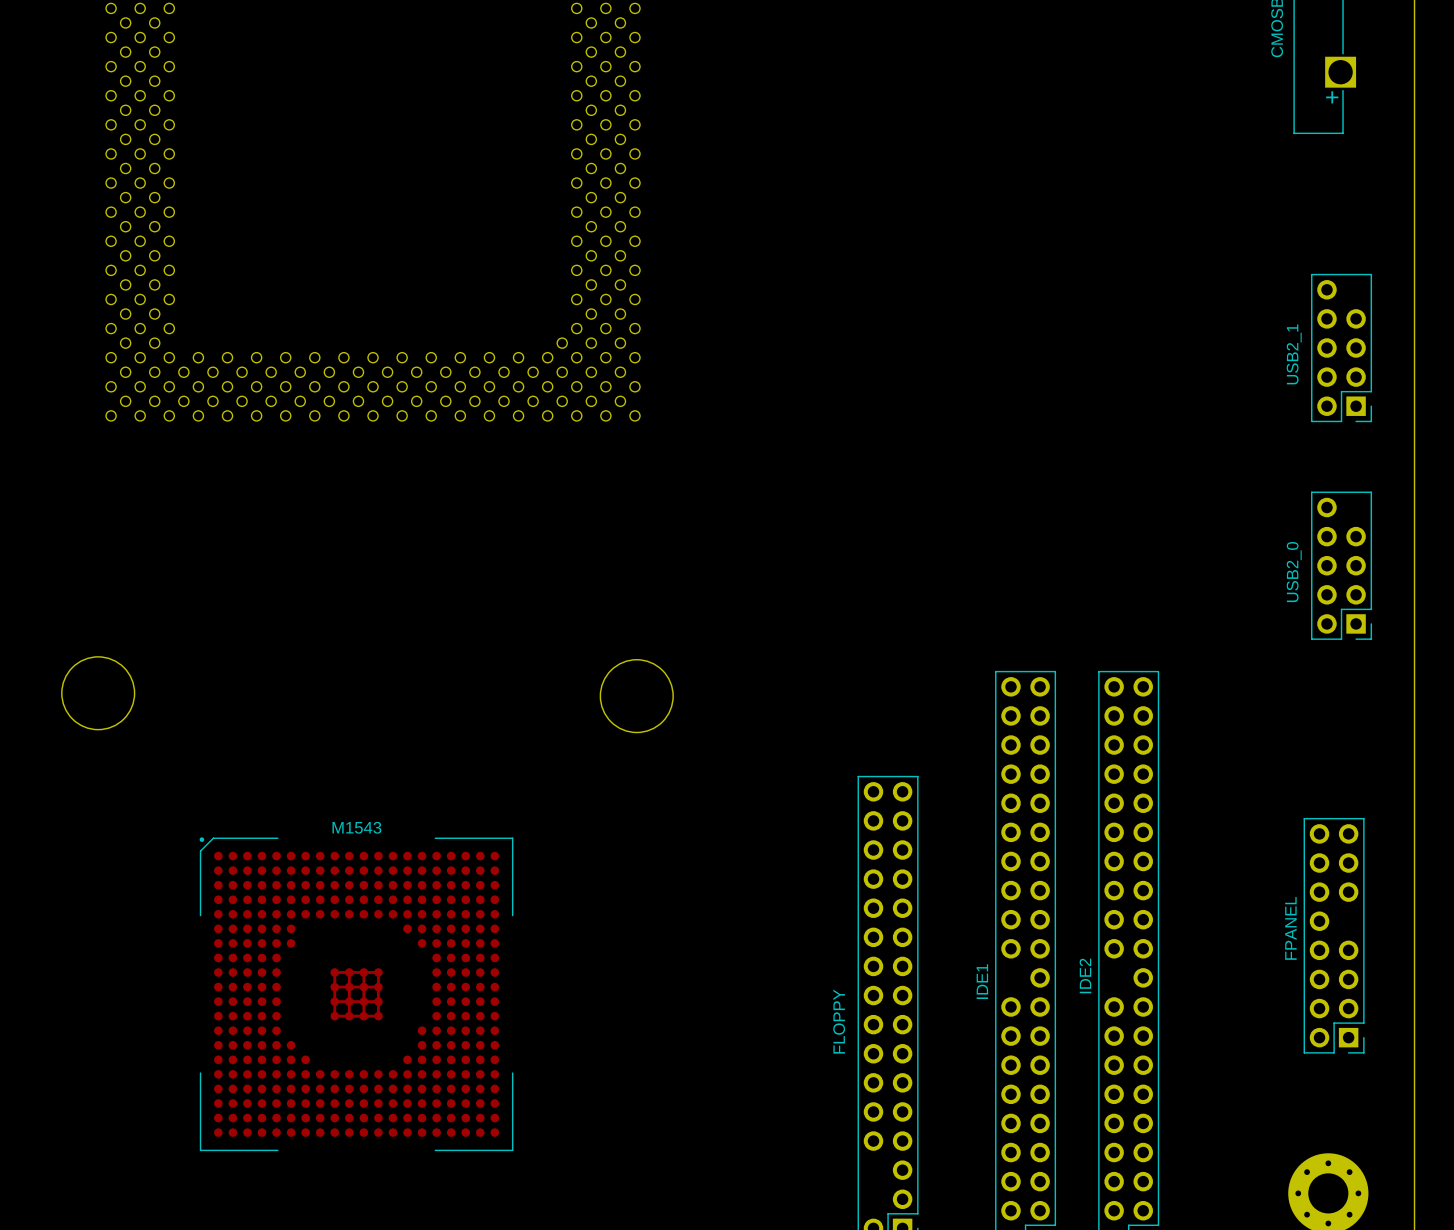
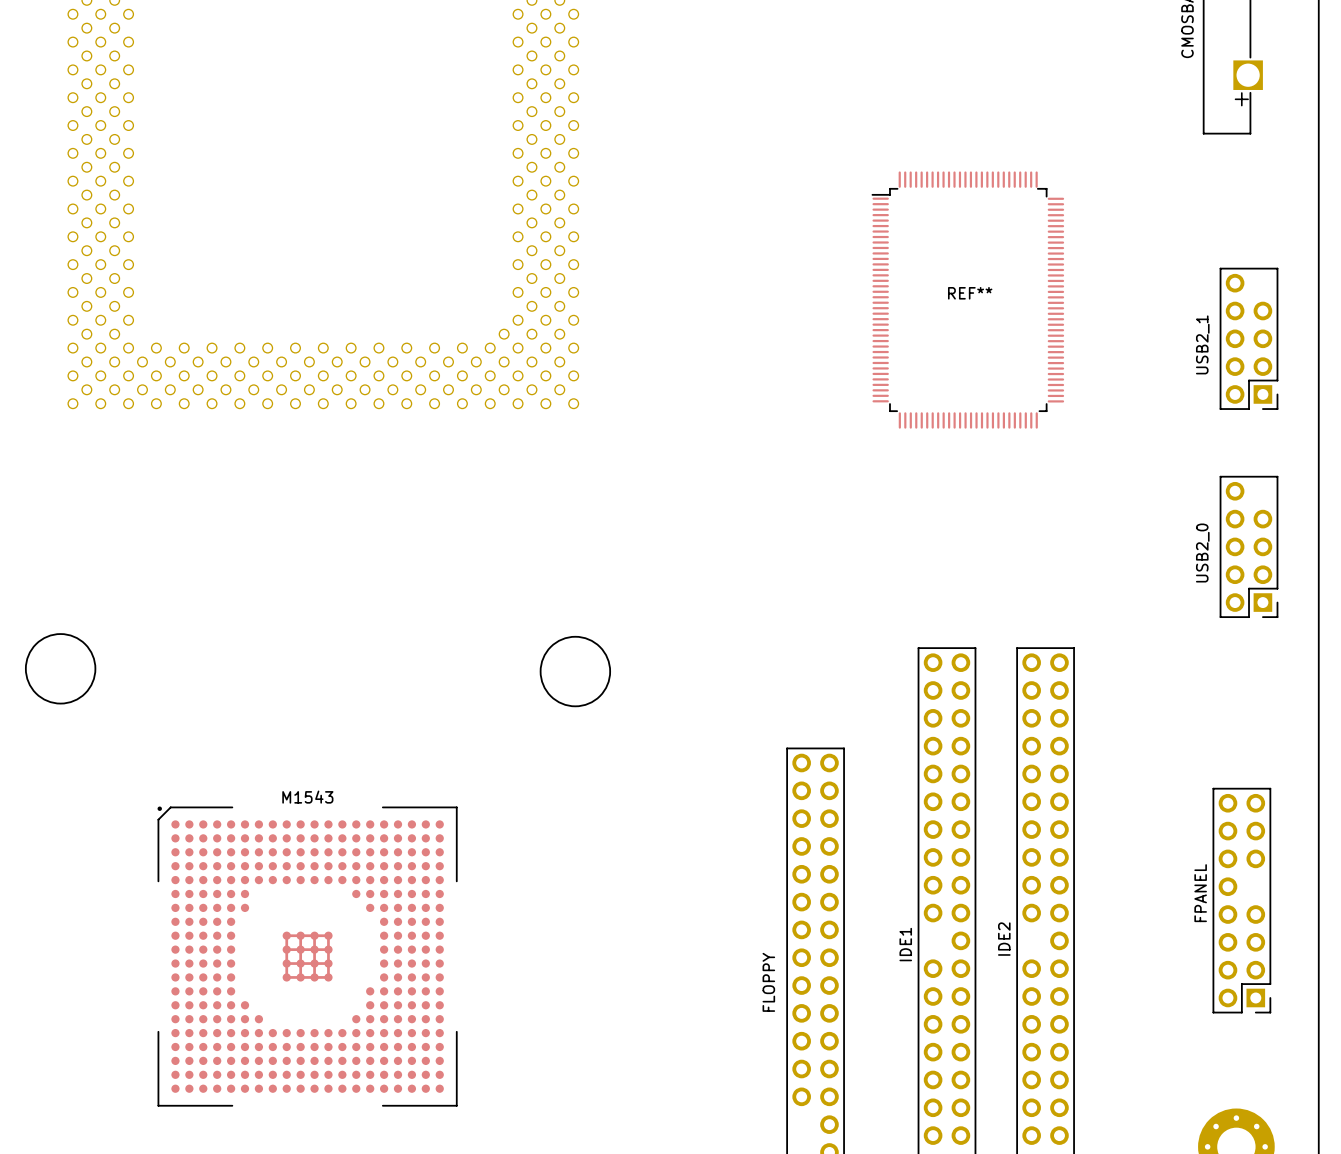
REF**: none -> (967, 300)

